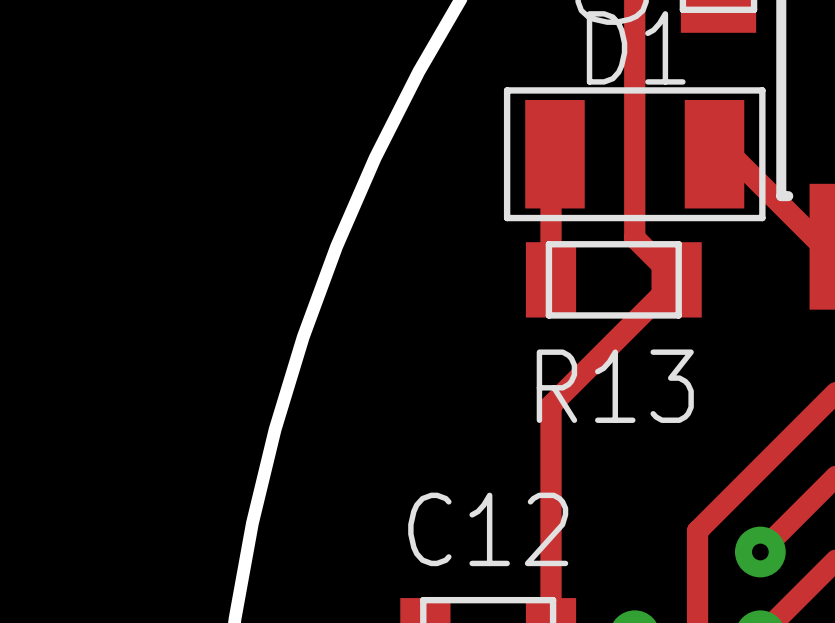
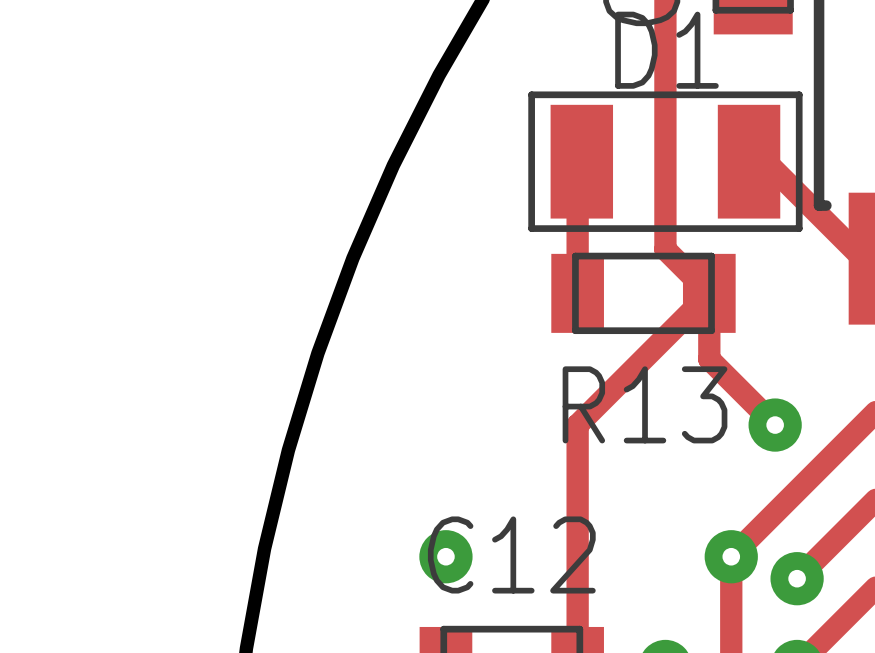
track: none -> (709, 293) (709, 359) (775, 425)
via: none -> (775, 425)
via: none -> (445, 556)
via: none -> (731, 556)

